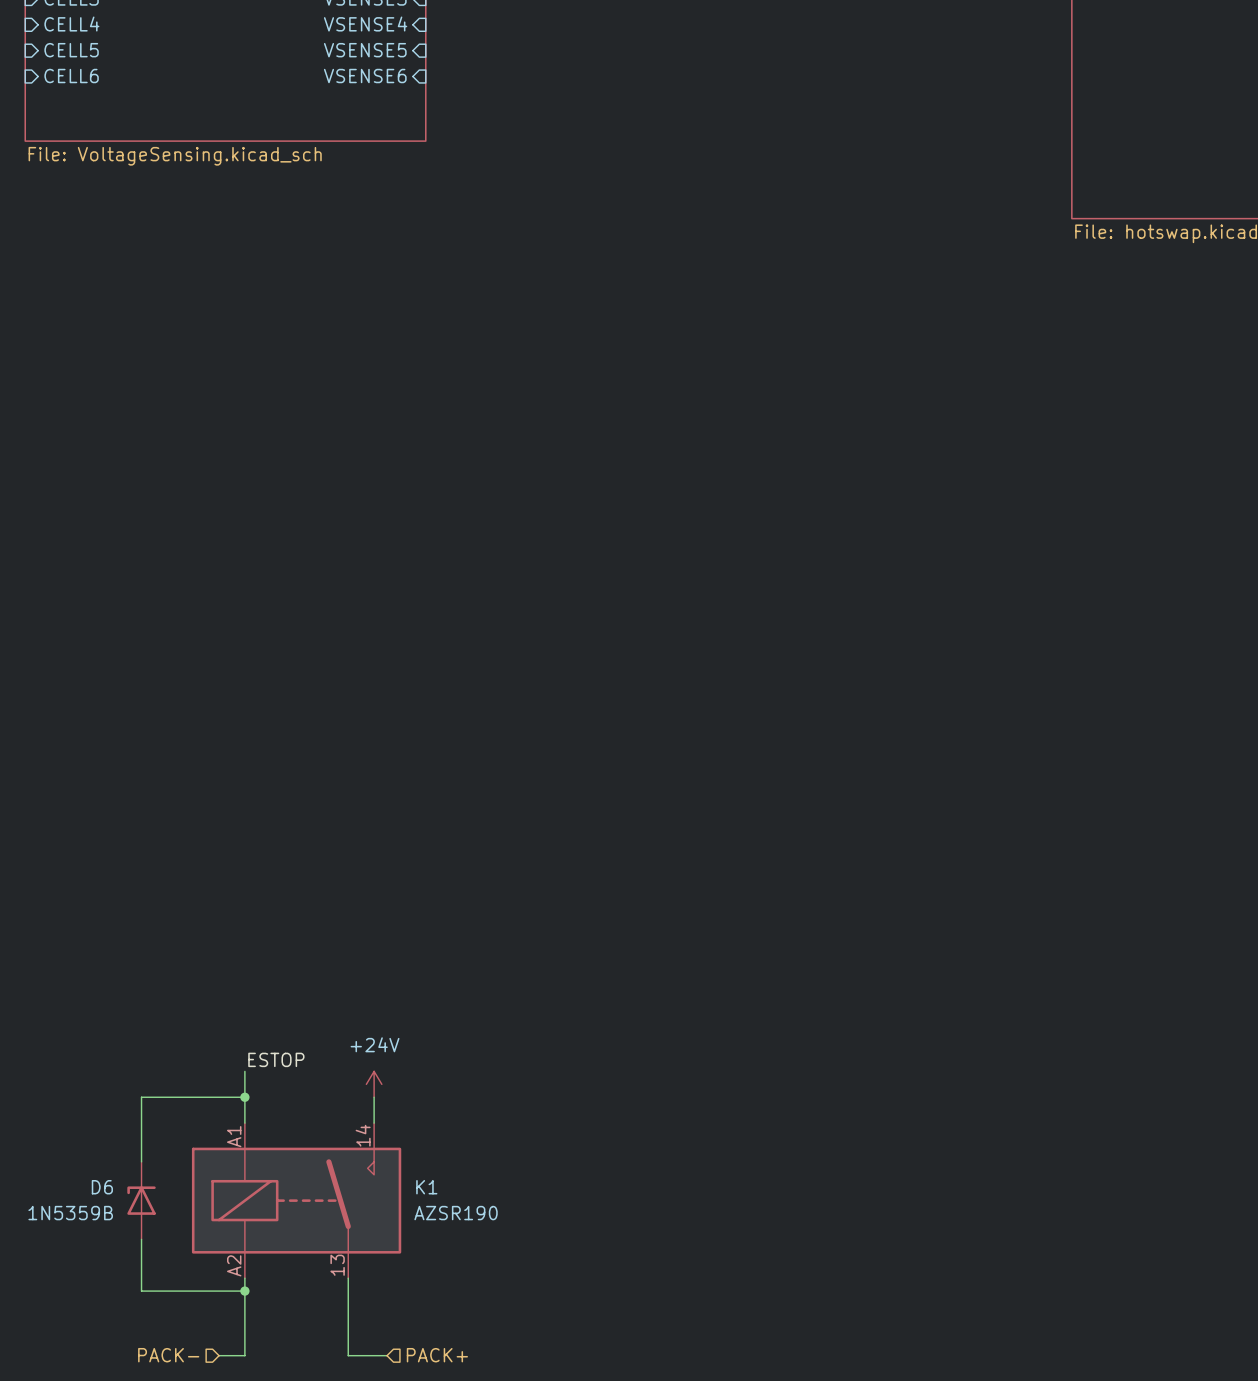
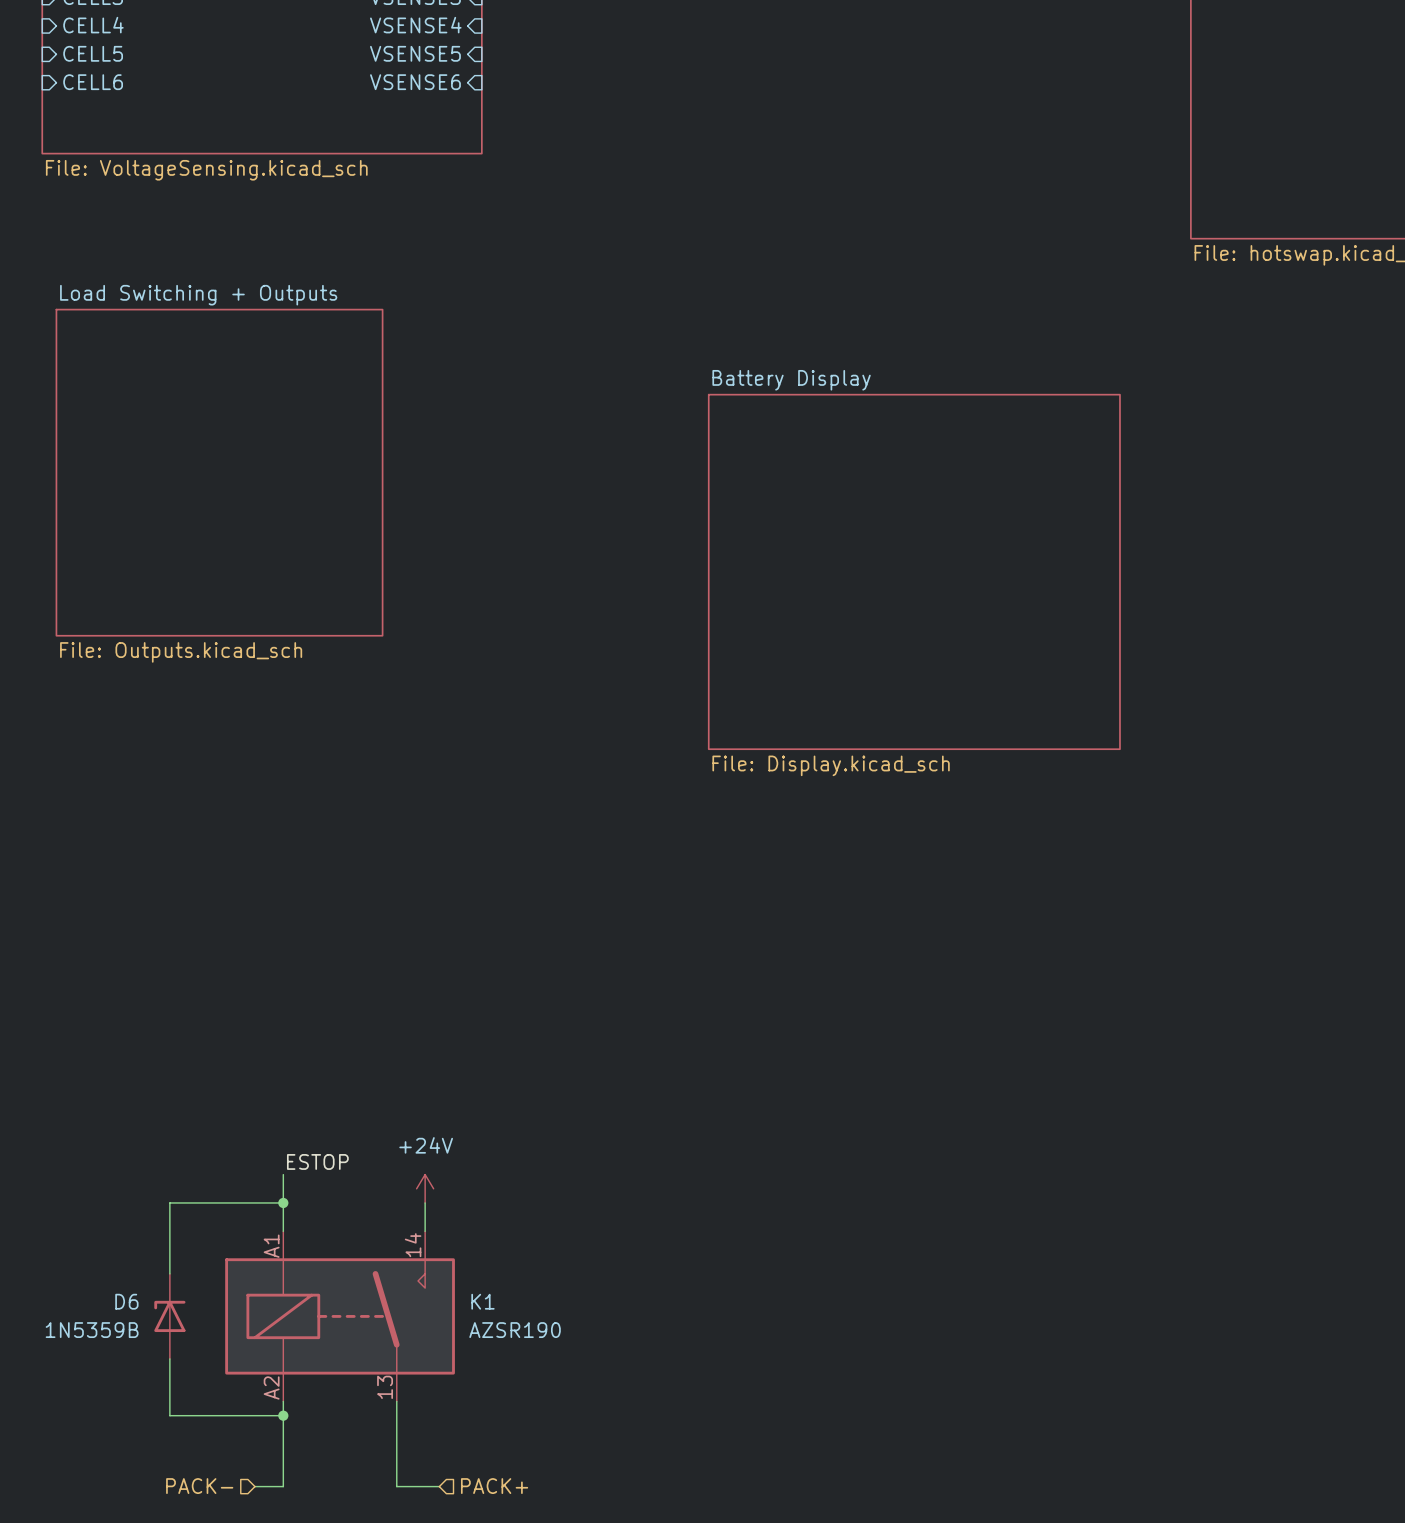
sheet Load Switching + Outputs: none -> File: Outputs.kicad_sch (219, 472)
sheet Battery Display: none -> File: Display.kicad_sch (914, 571)

